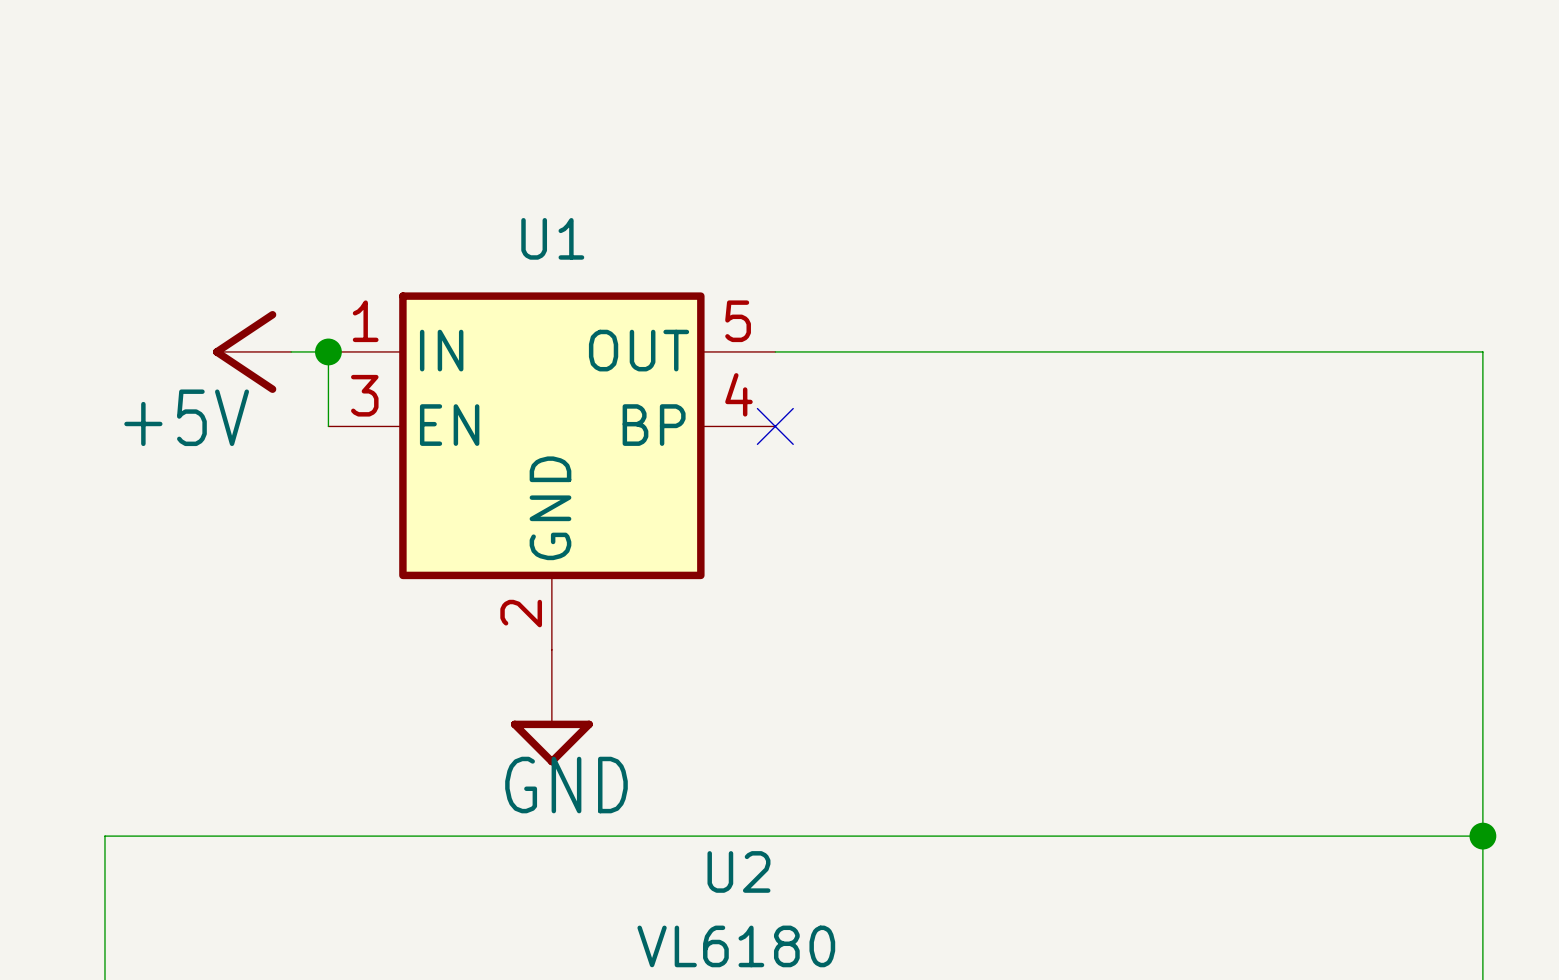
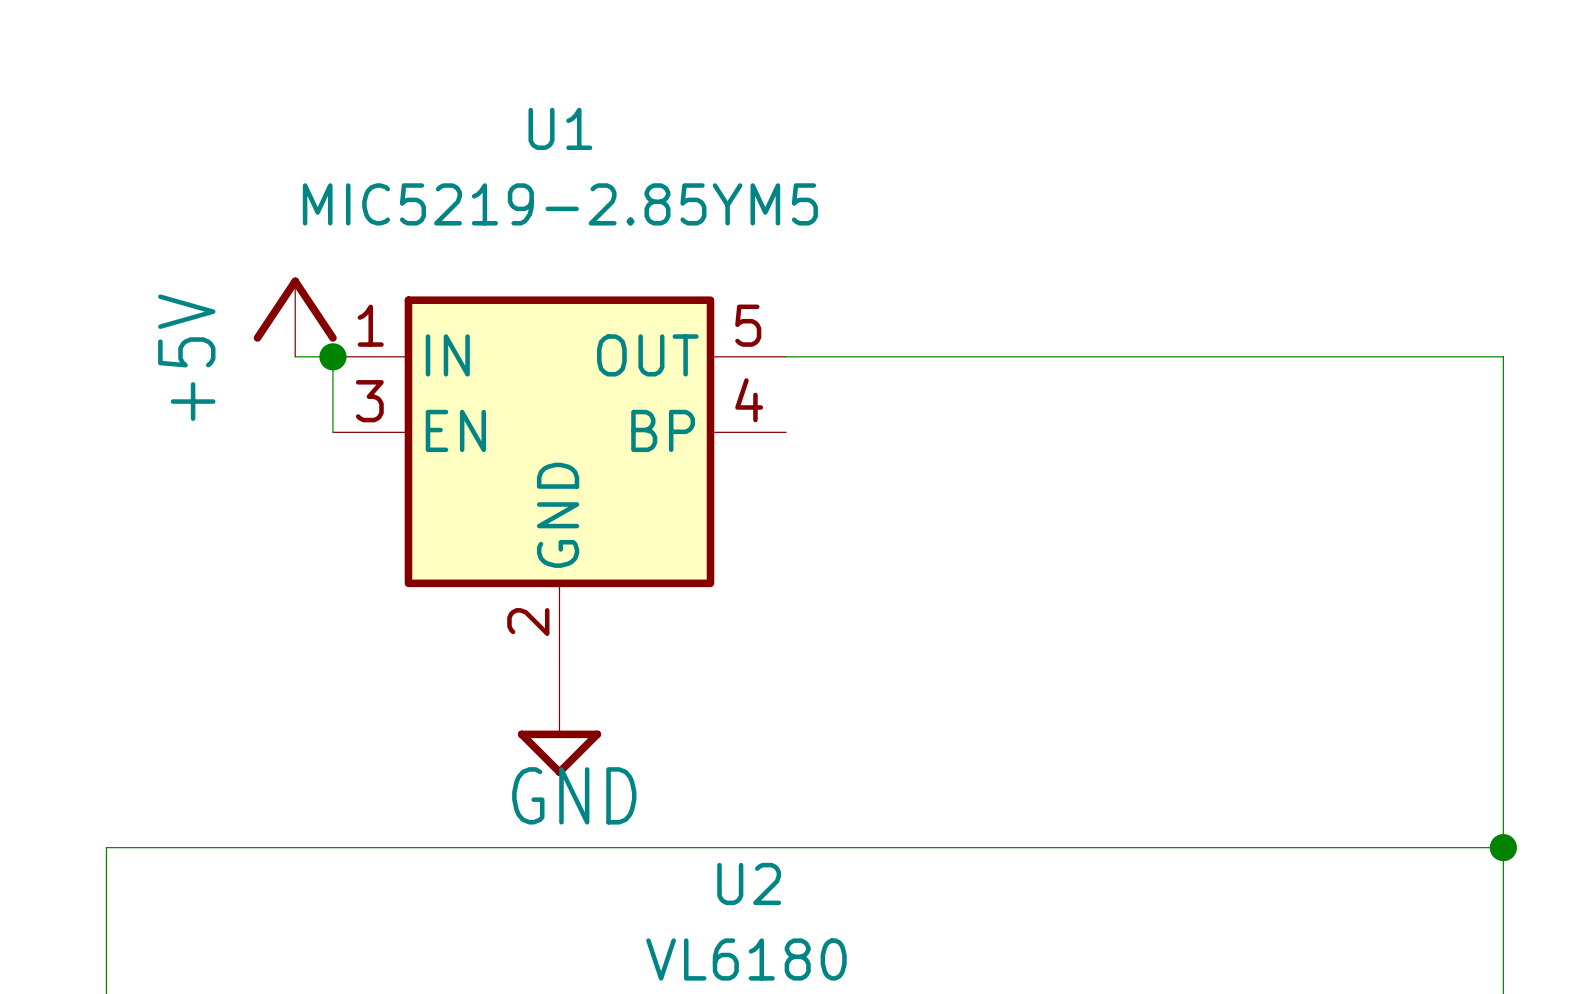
U1 value: none -> MIC5219-2.85YM5 (560, 204)
U1 name position: U1 (552, 238) -> U1 (560, 128)
power symbol rotation: 0° (244, 351) -> 90° clockwise (295, 309)
power symbol position: +5V (252, 351) -> +5V (295, 317)
no-connect mark: (775, 426) -> none

